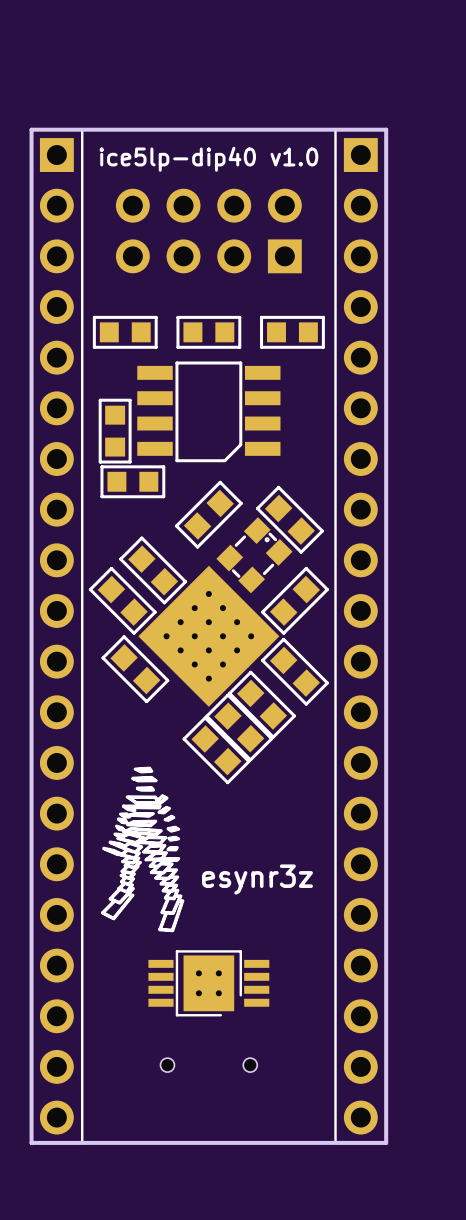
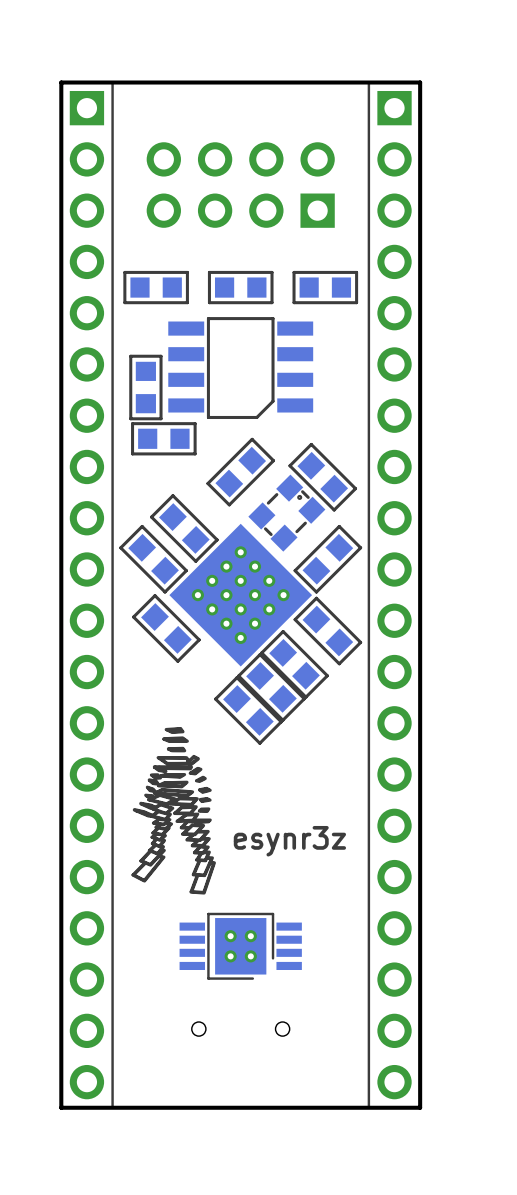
text: ice5lp-dip40 v1.0 (208, 159) -> none

